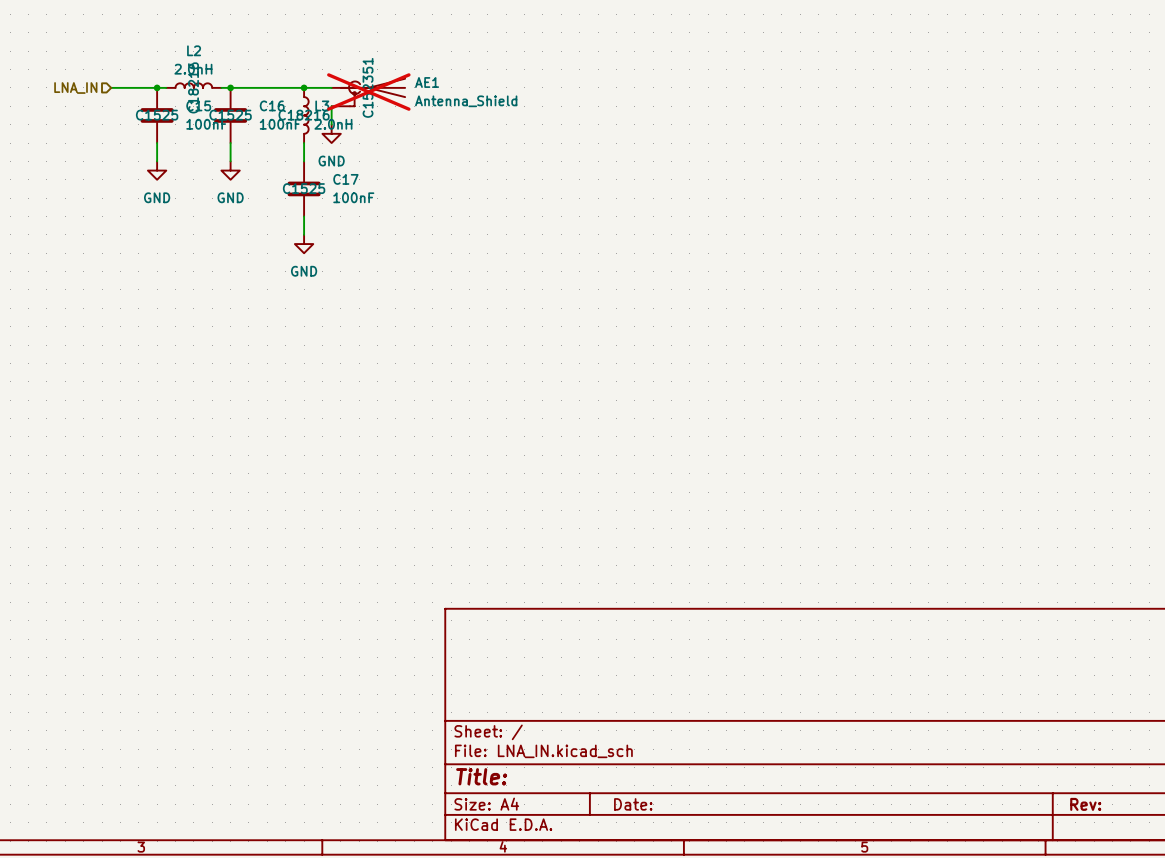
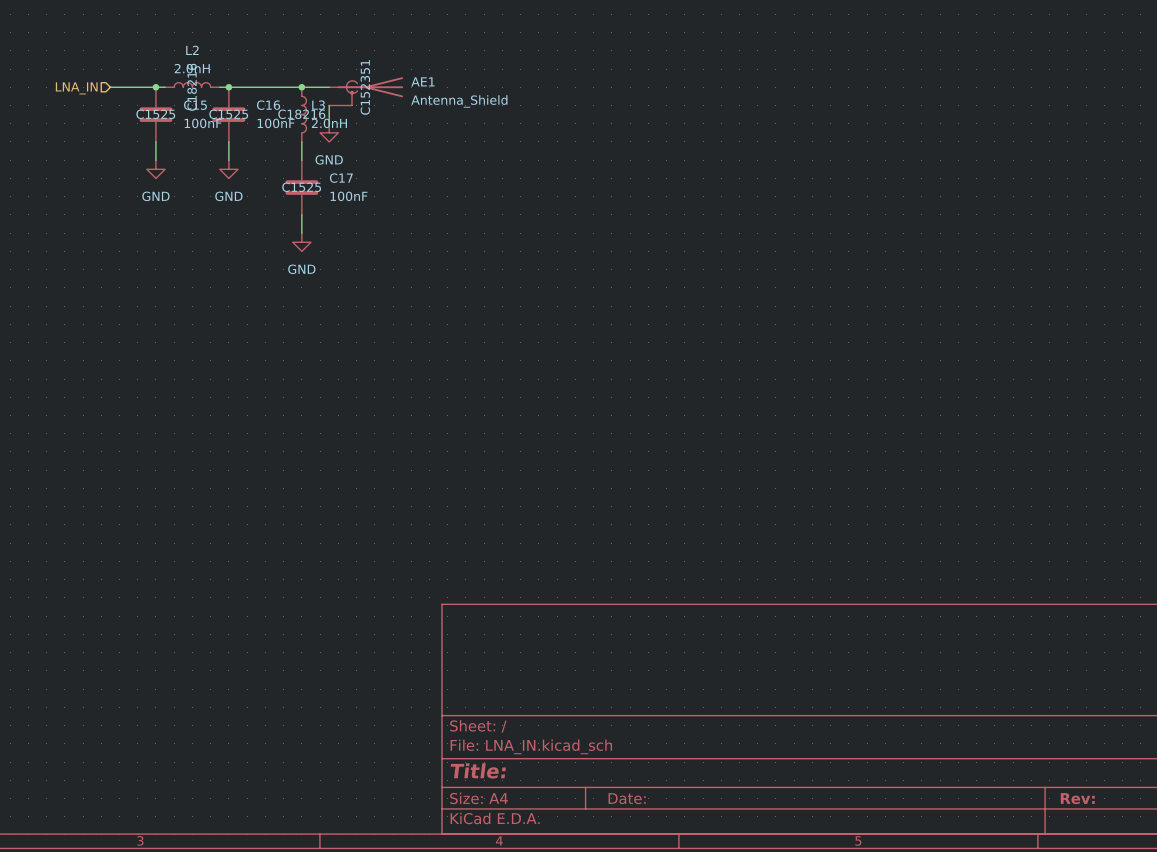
AE1 do-not-place cross: (368, 92) -> none

